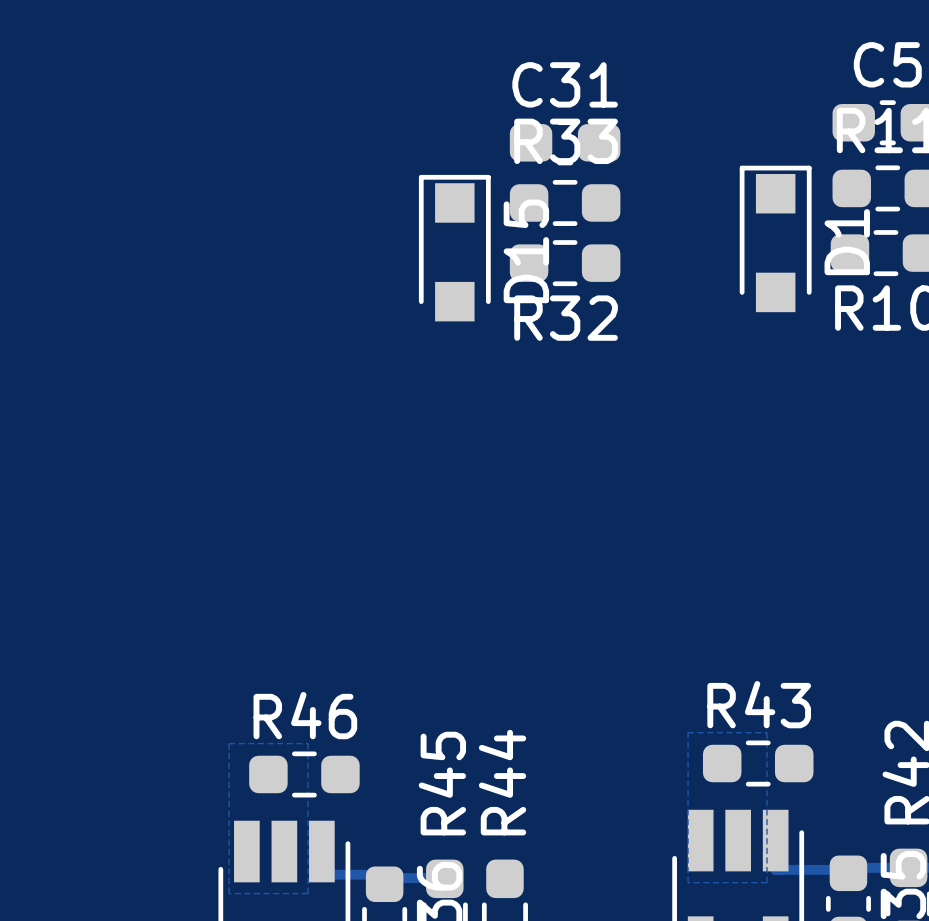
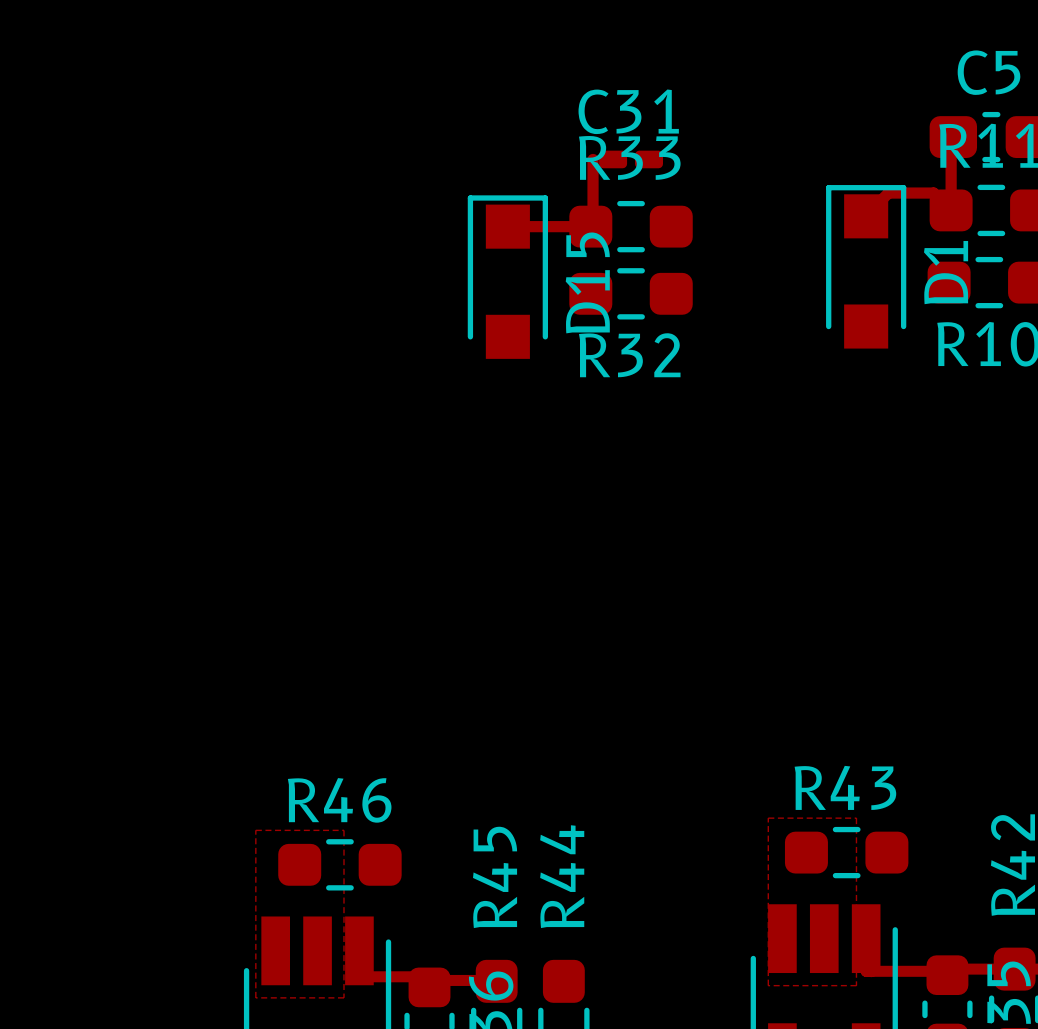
C31 footprint: [509, 120, 621, 166] -> [599, 150, 664, 169]
track: none -> (953, 137) (951, 139) (951, 210) (933, 193) (888, 193) (866, 215)
track: none -> (593, 159) (593, 224) (590, 226) (507, 226)

